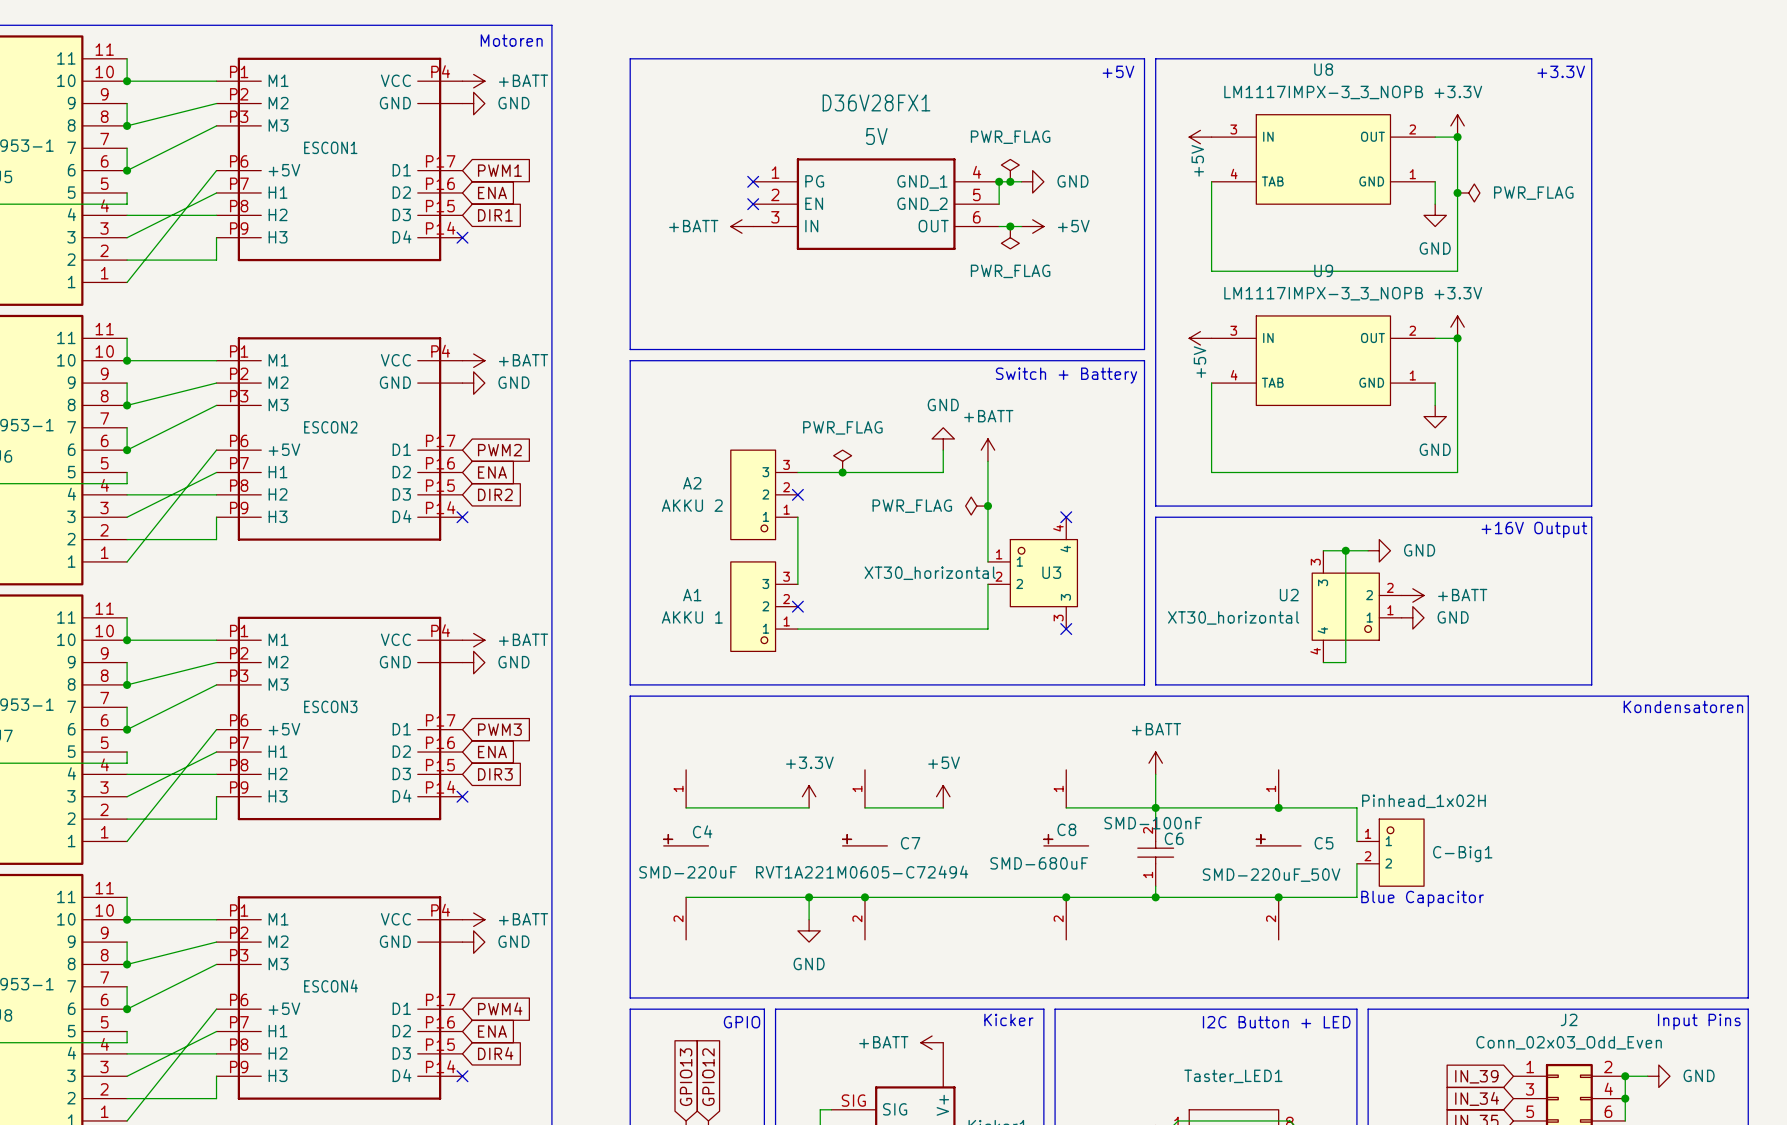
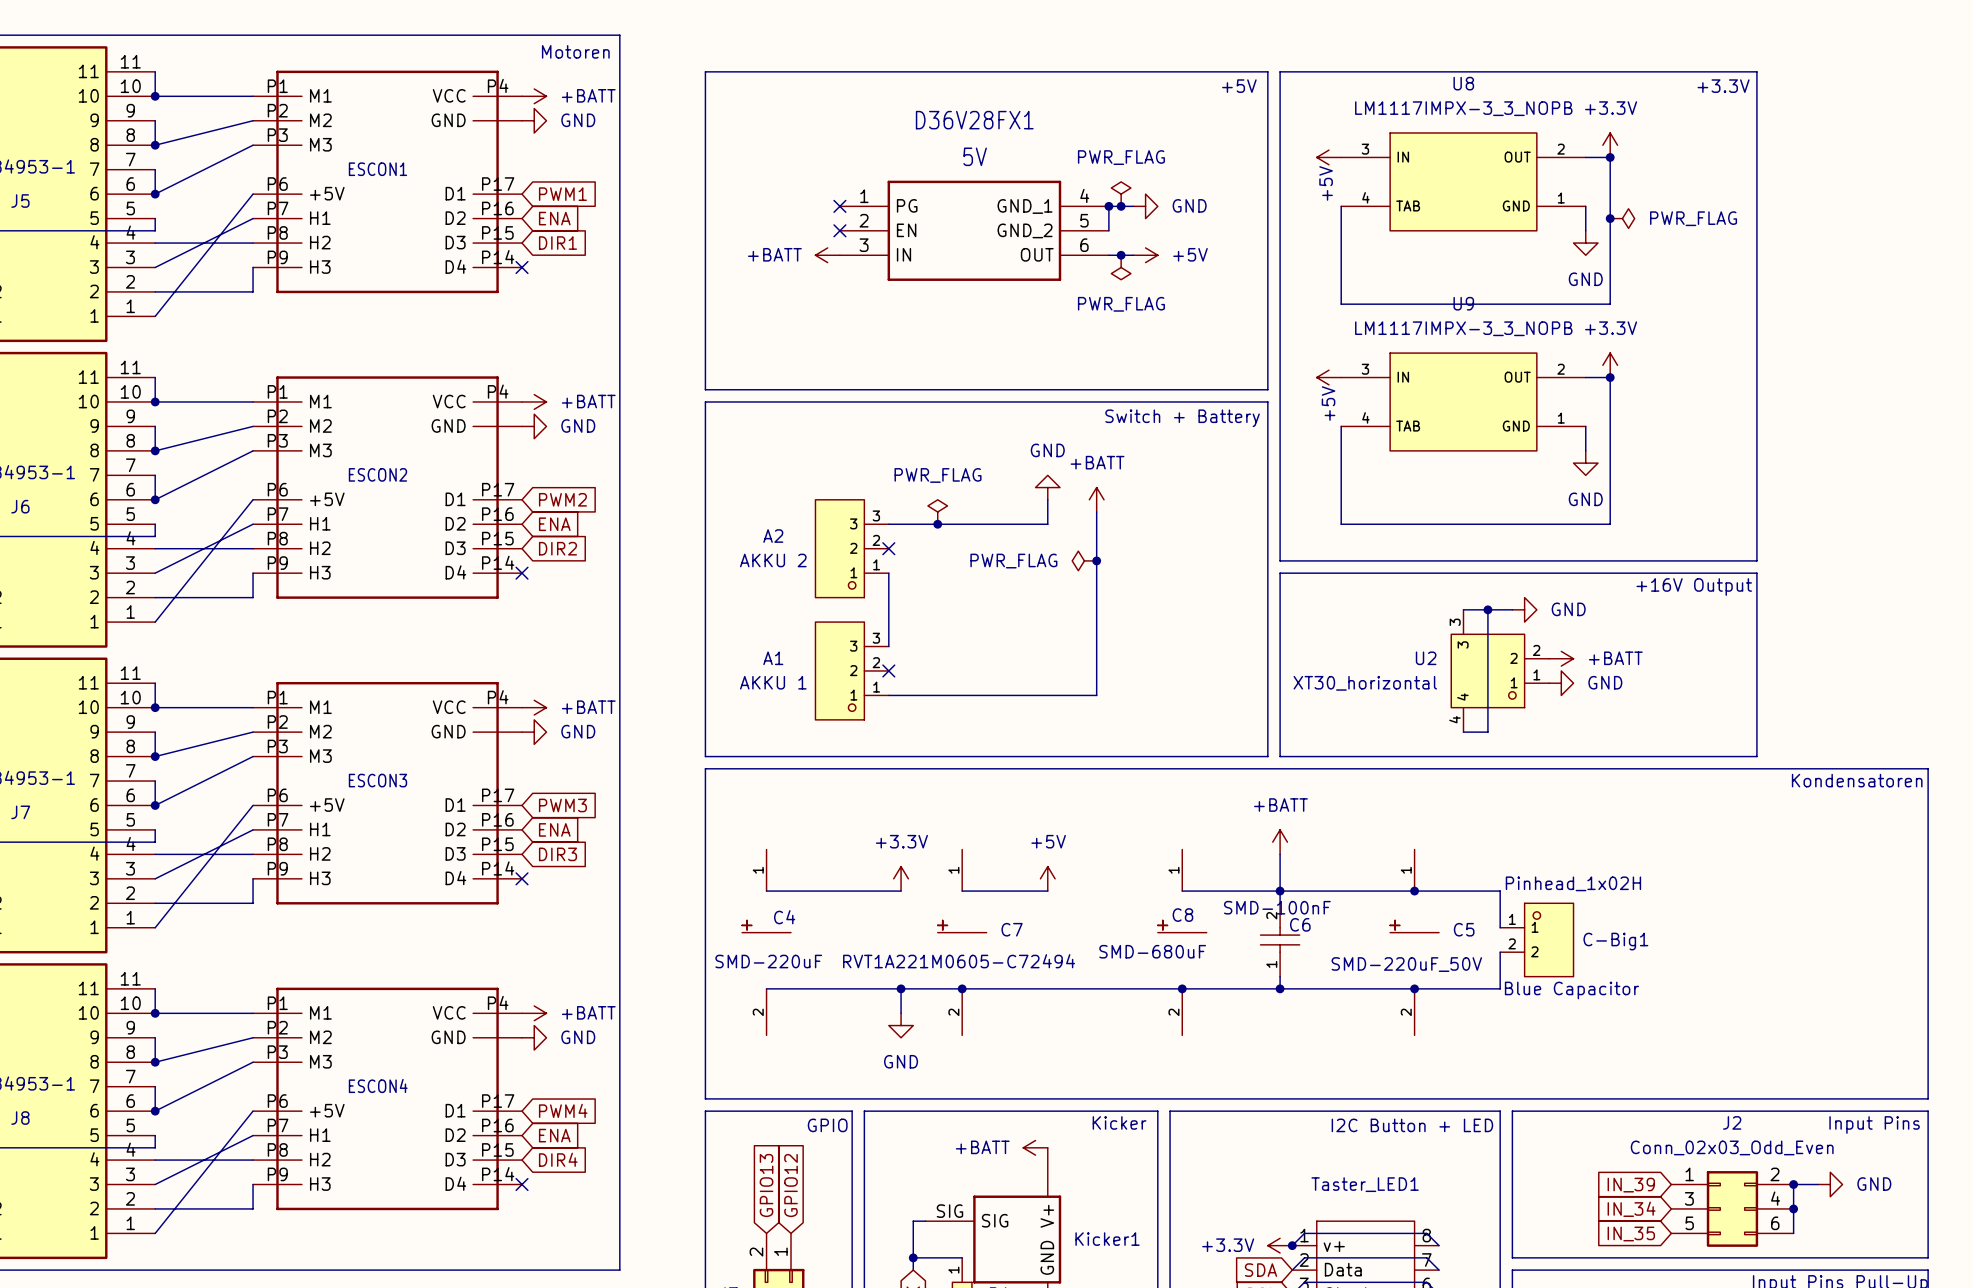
no-connect mark: (1066, 517) -> none
wire: none -> (1096, 622) (1096, 646)
U3: XT30_horizontal (1032, 573) -> none
no-connect mark: (1066, 629) -> none

